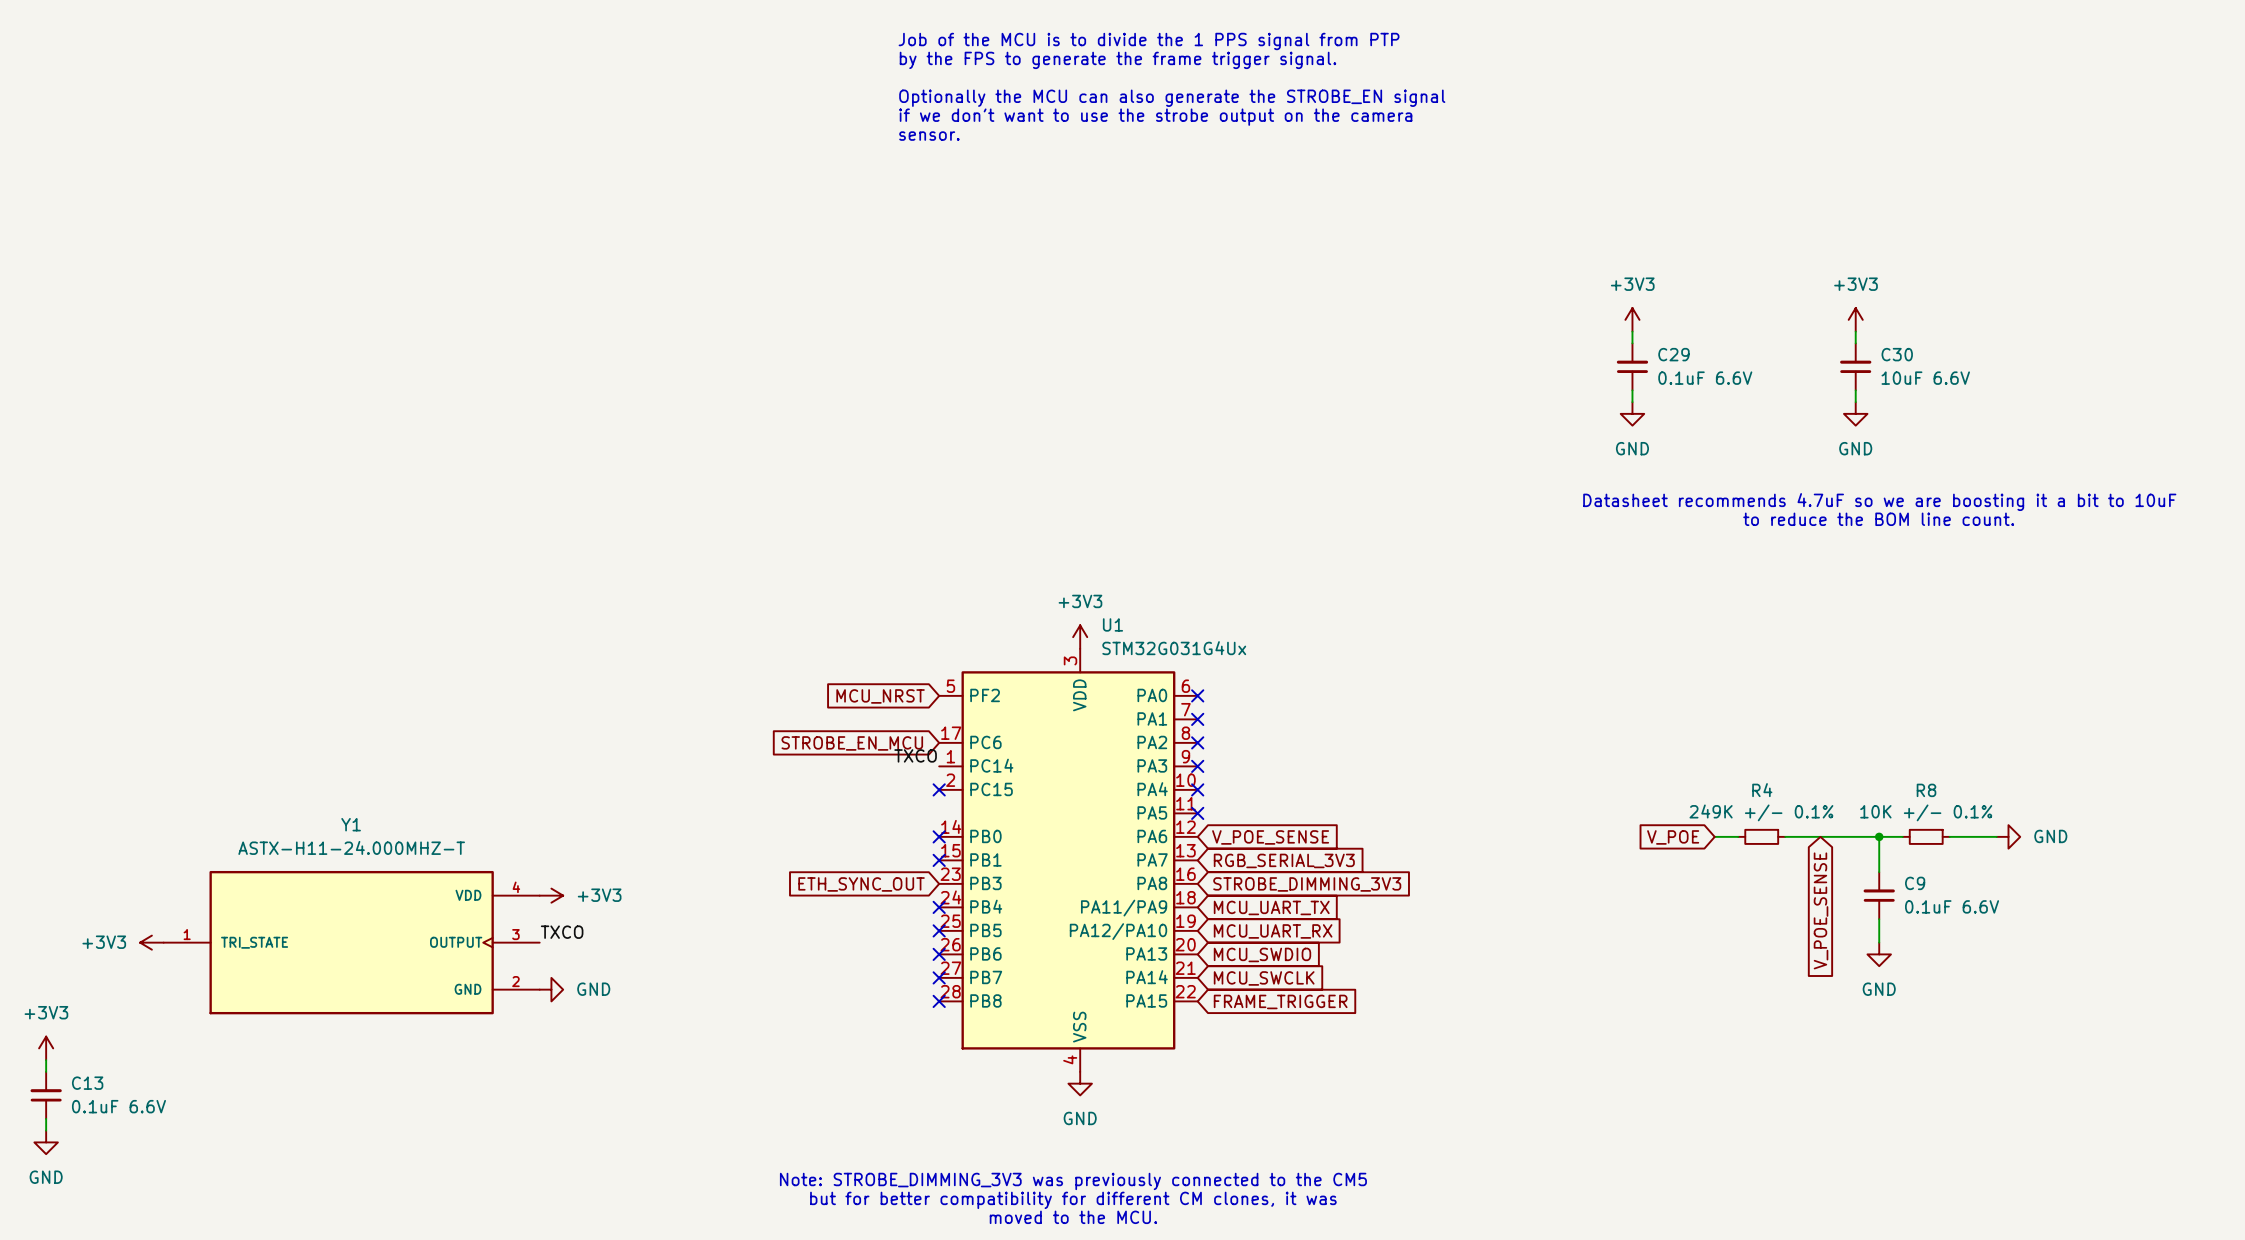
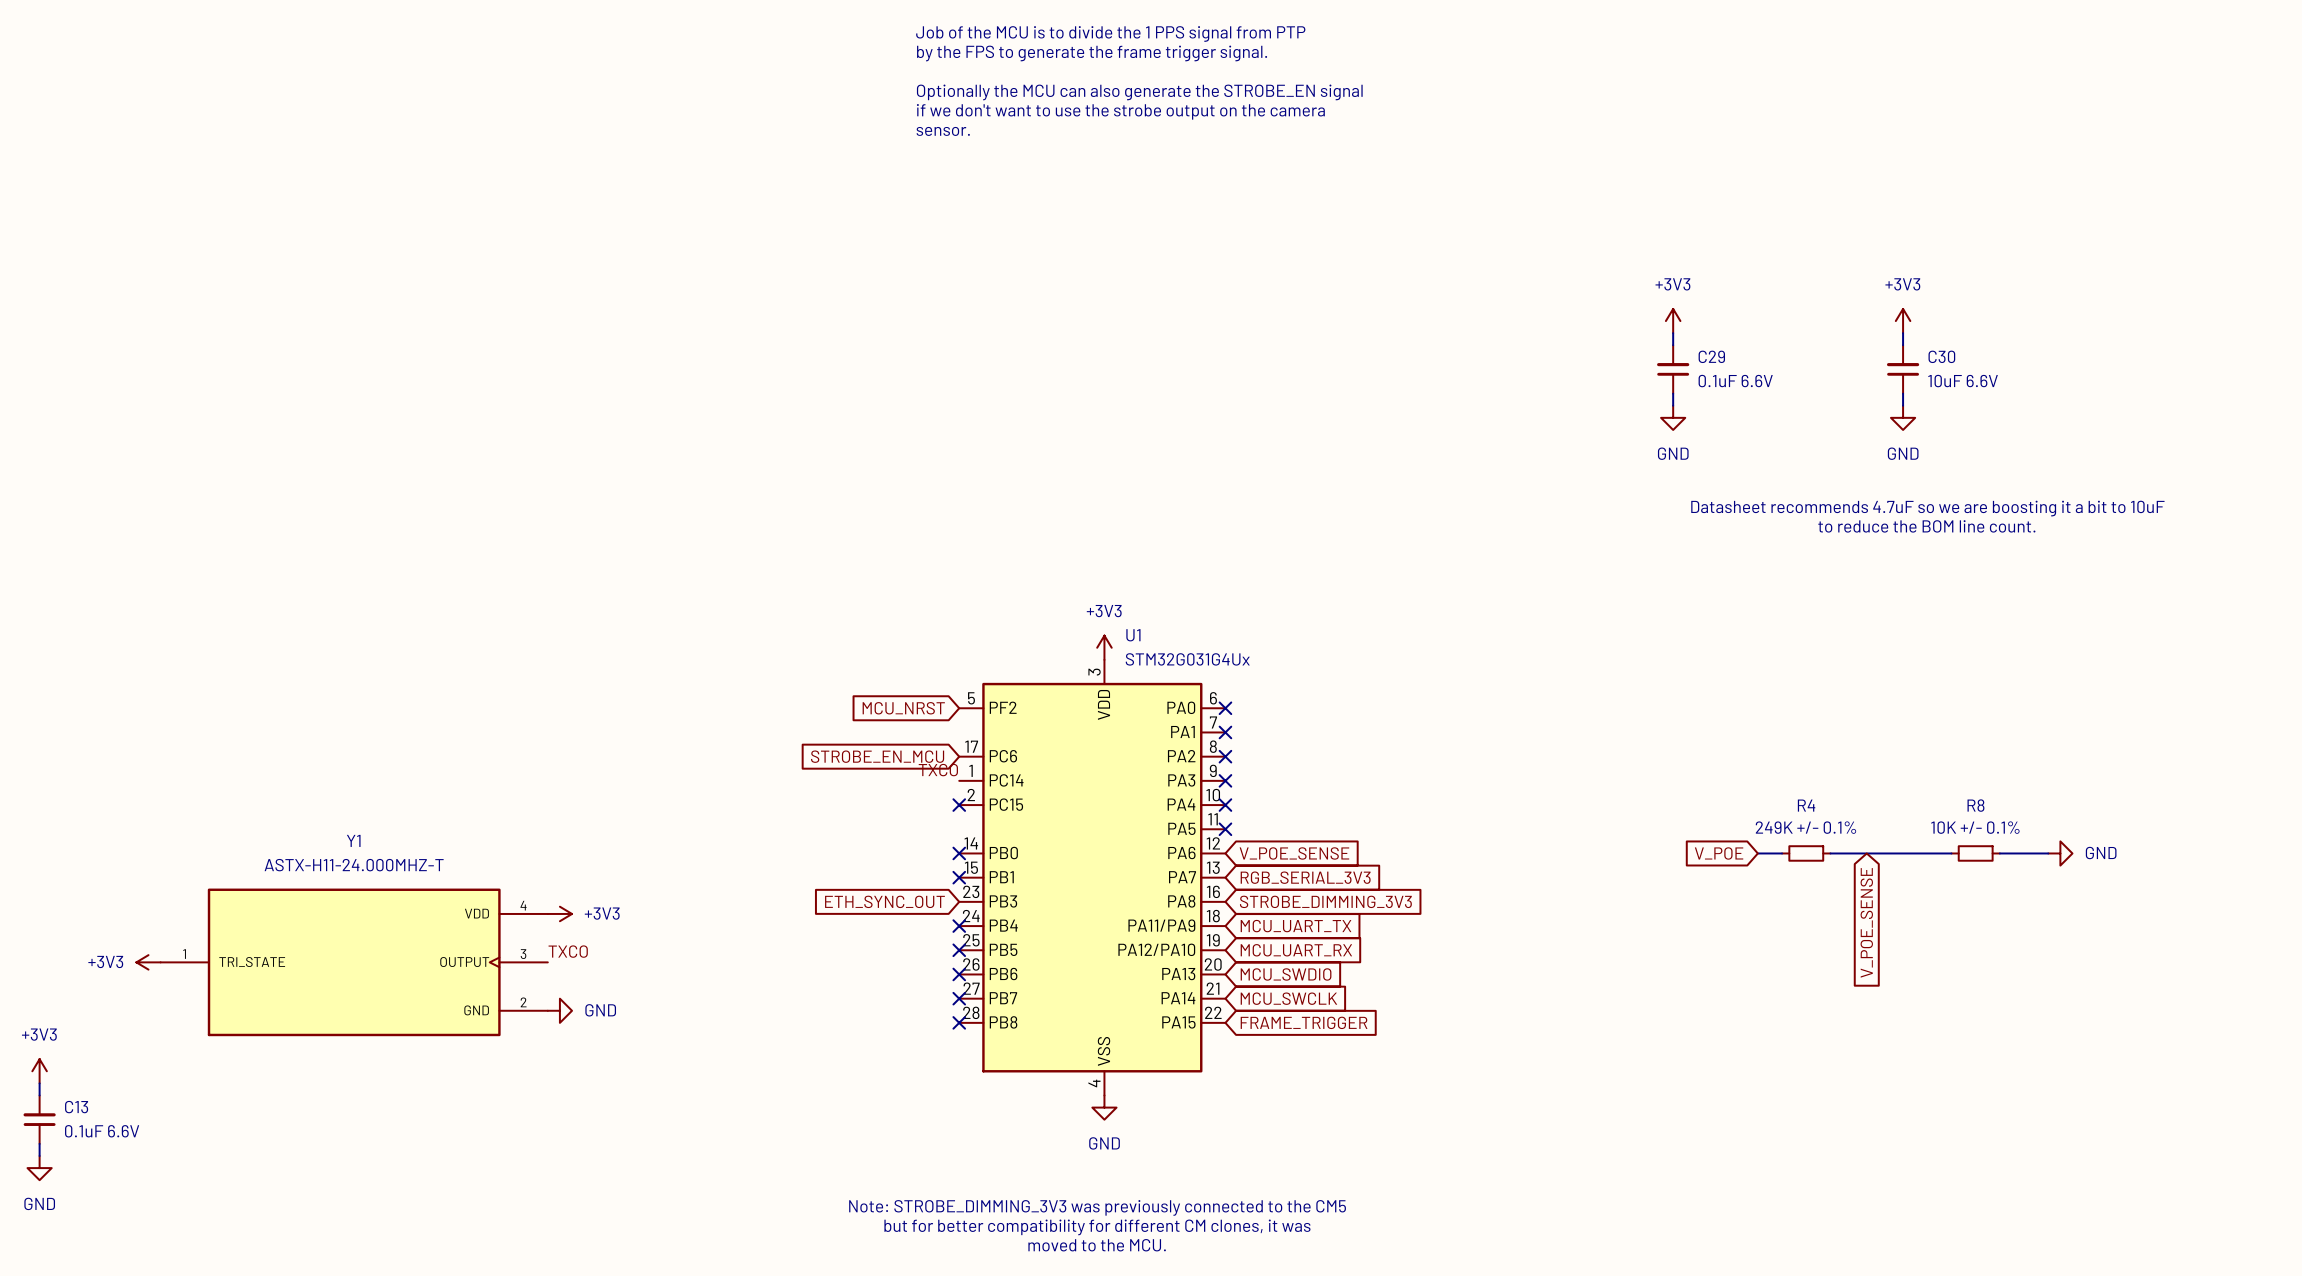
wire: (1879, 836) (1879, 872) -> none
junction: (1879, 836) -> none
C9: 0.1uF 6.6V (1879, 895) -> none
wire: (1879, 919) (1879, 942) -> none
power symbol: GND (1879, 954) -> none

